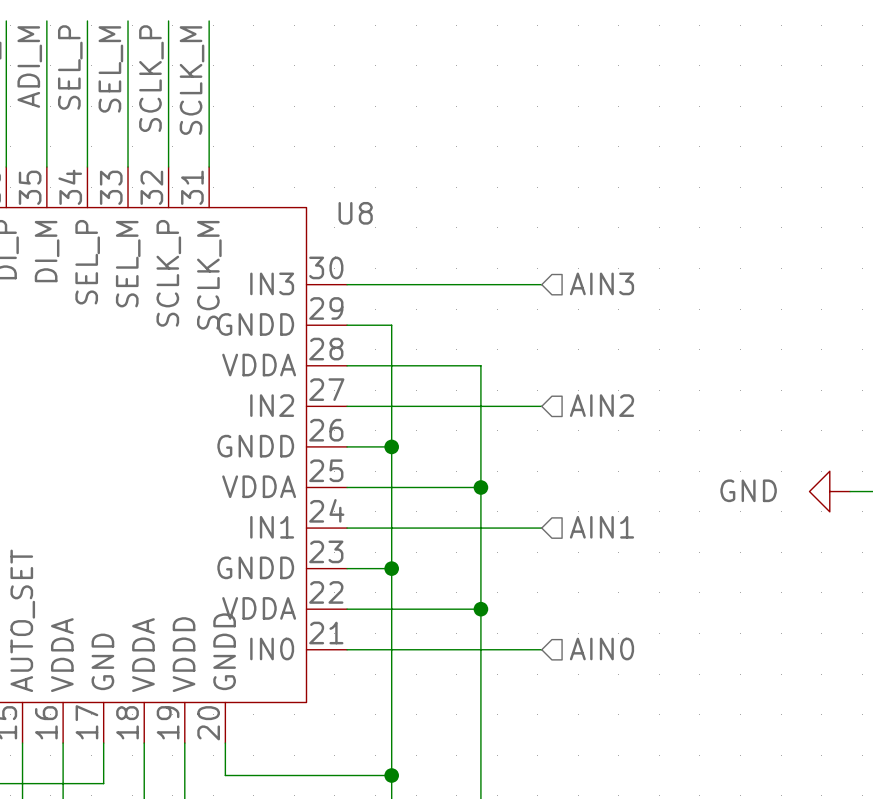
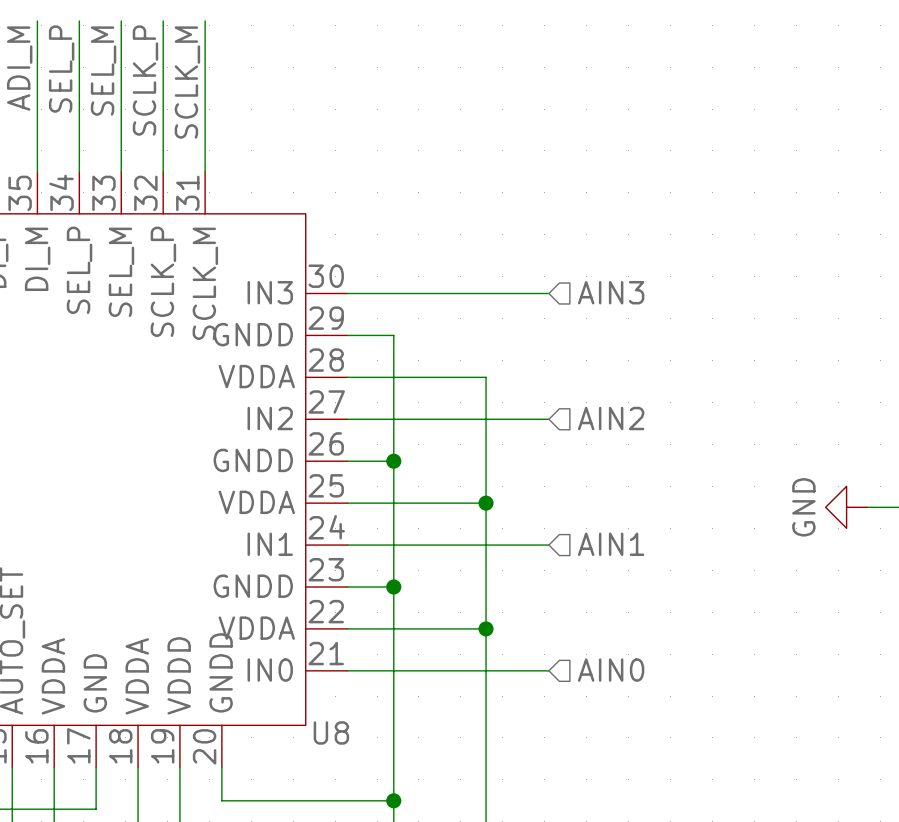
U8 name position: U8 (355, 213) -> U8 (331, 732)
power symbol text rotation: 0° (748, 490) -> 90° counterclockwise (803, 507)

